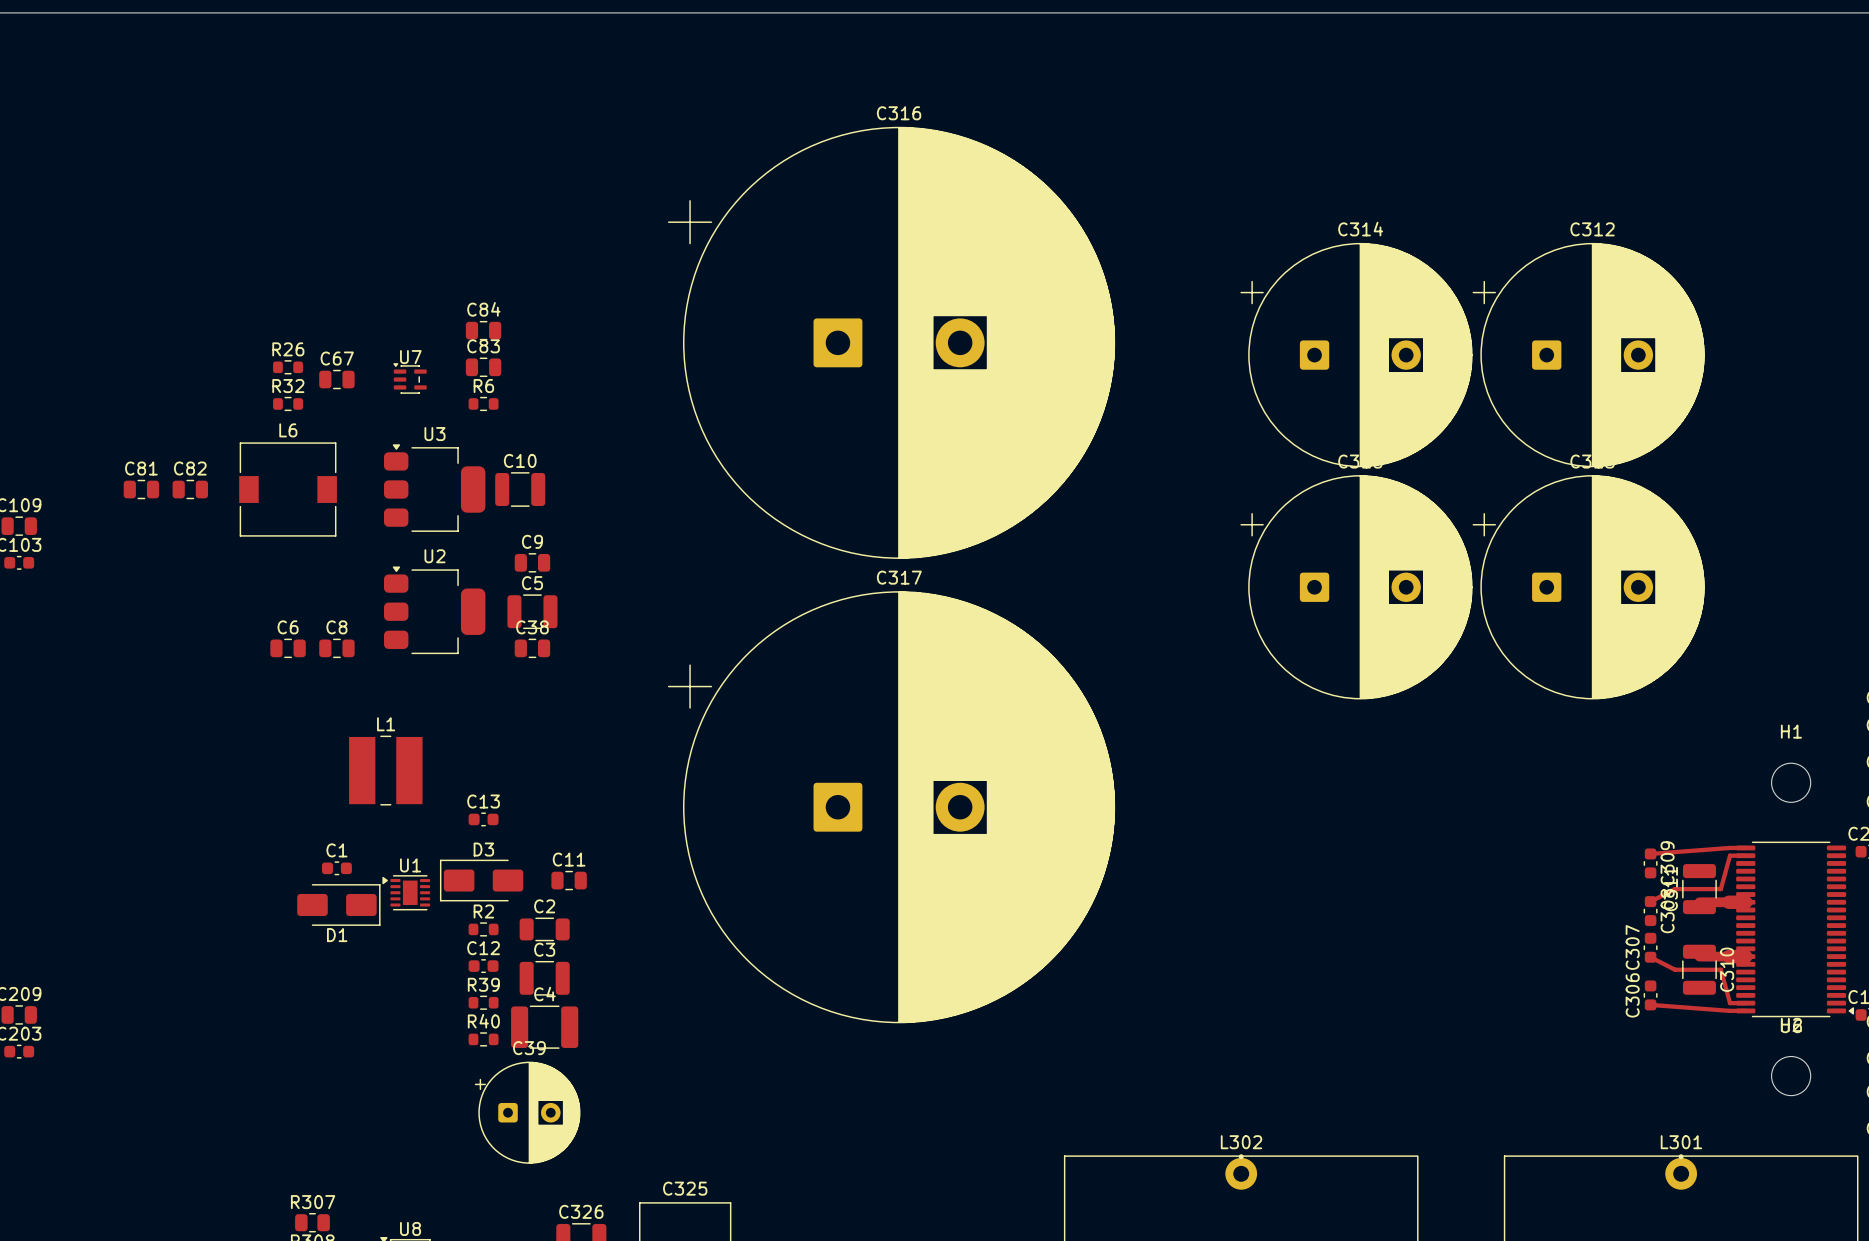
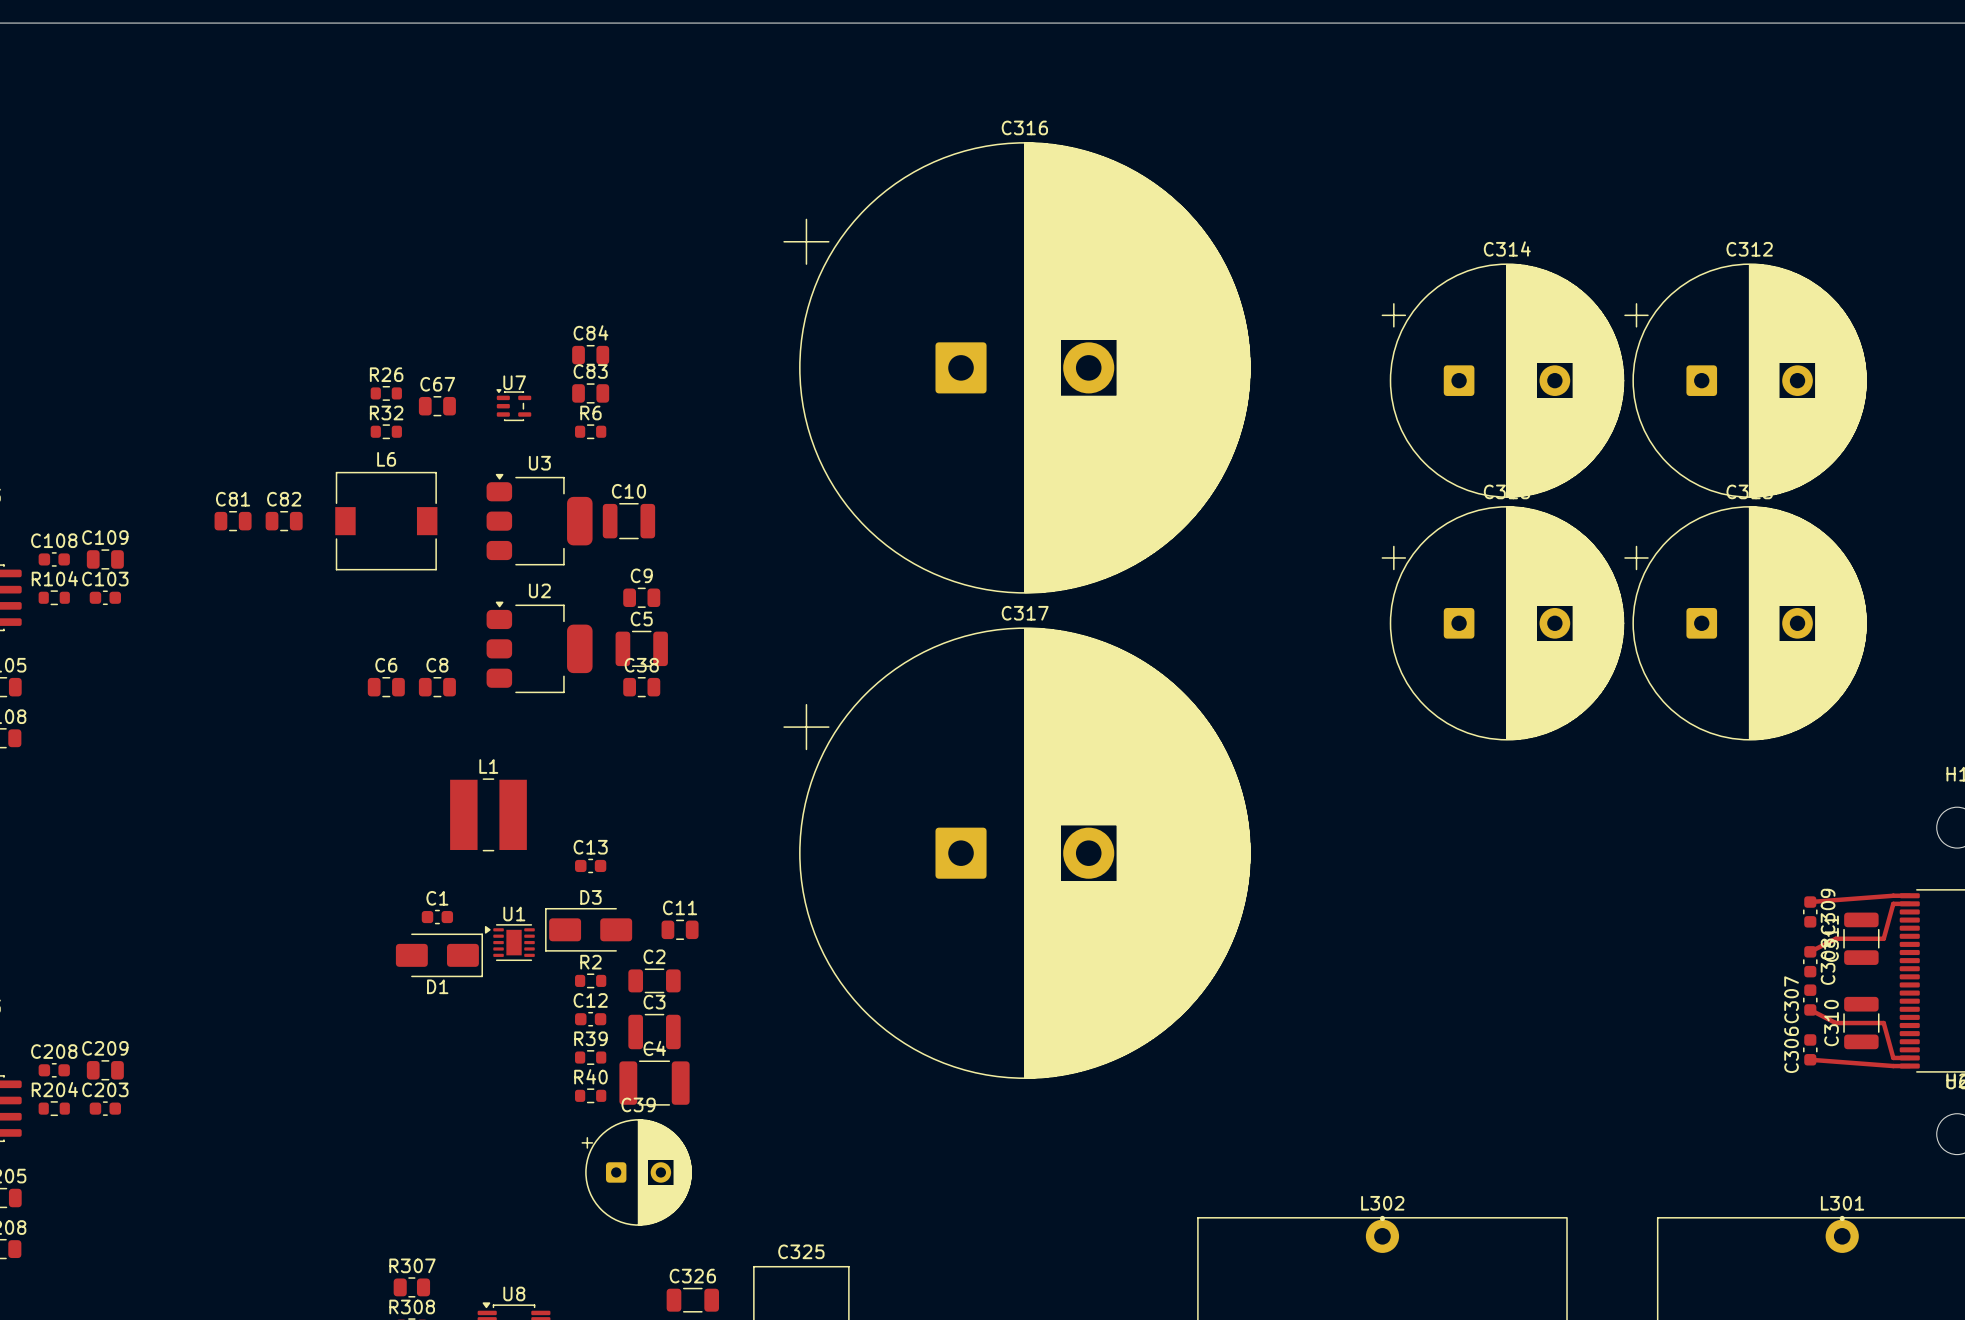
top track: (1699, 902) (1745, 902) -> none
top track: (1699, 956) (1745, 956) -> none
C310 name position: C310 (1727, 969) -> C310 (1831, 1023)

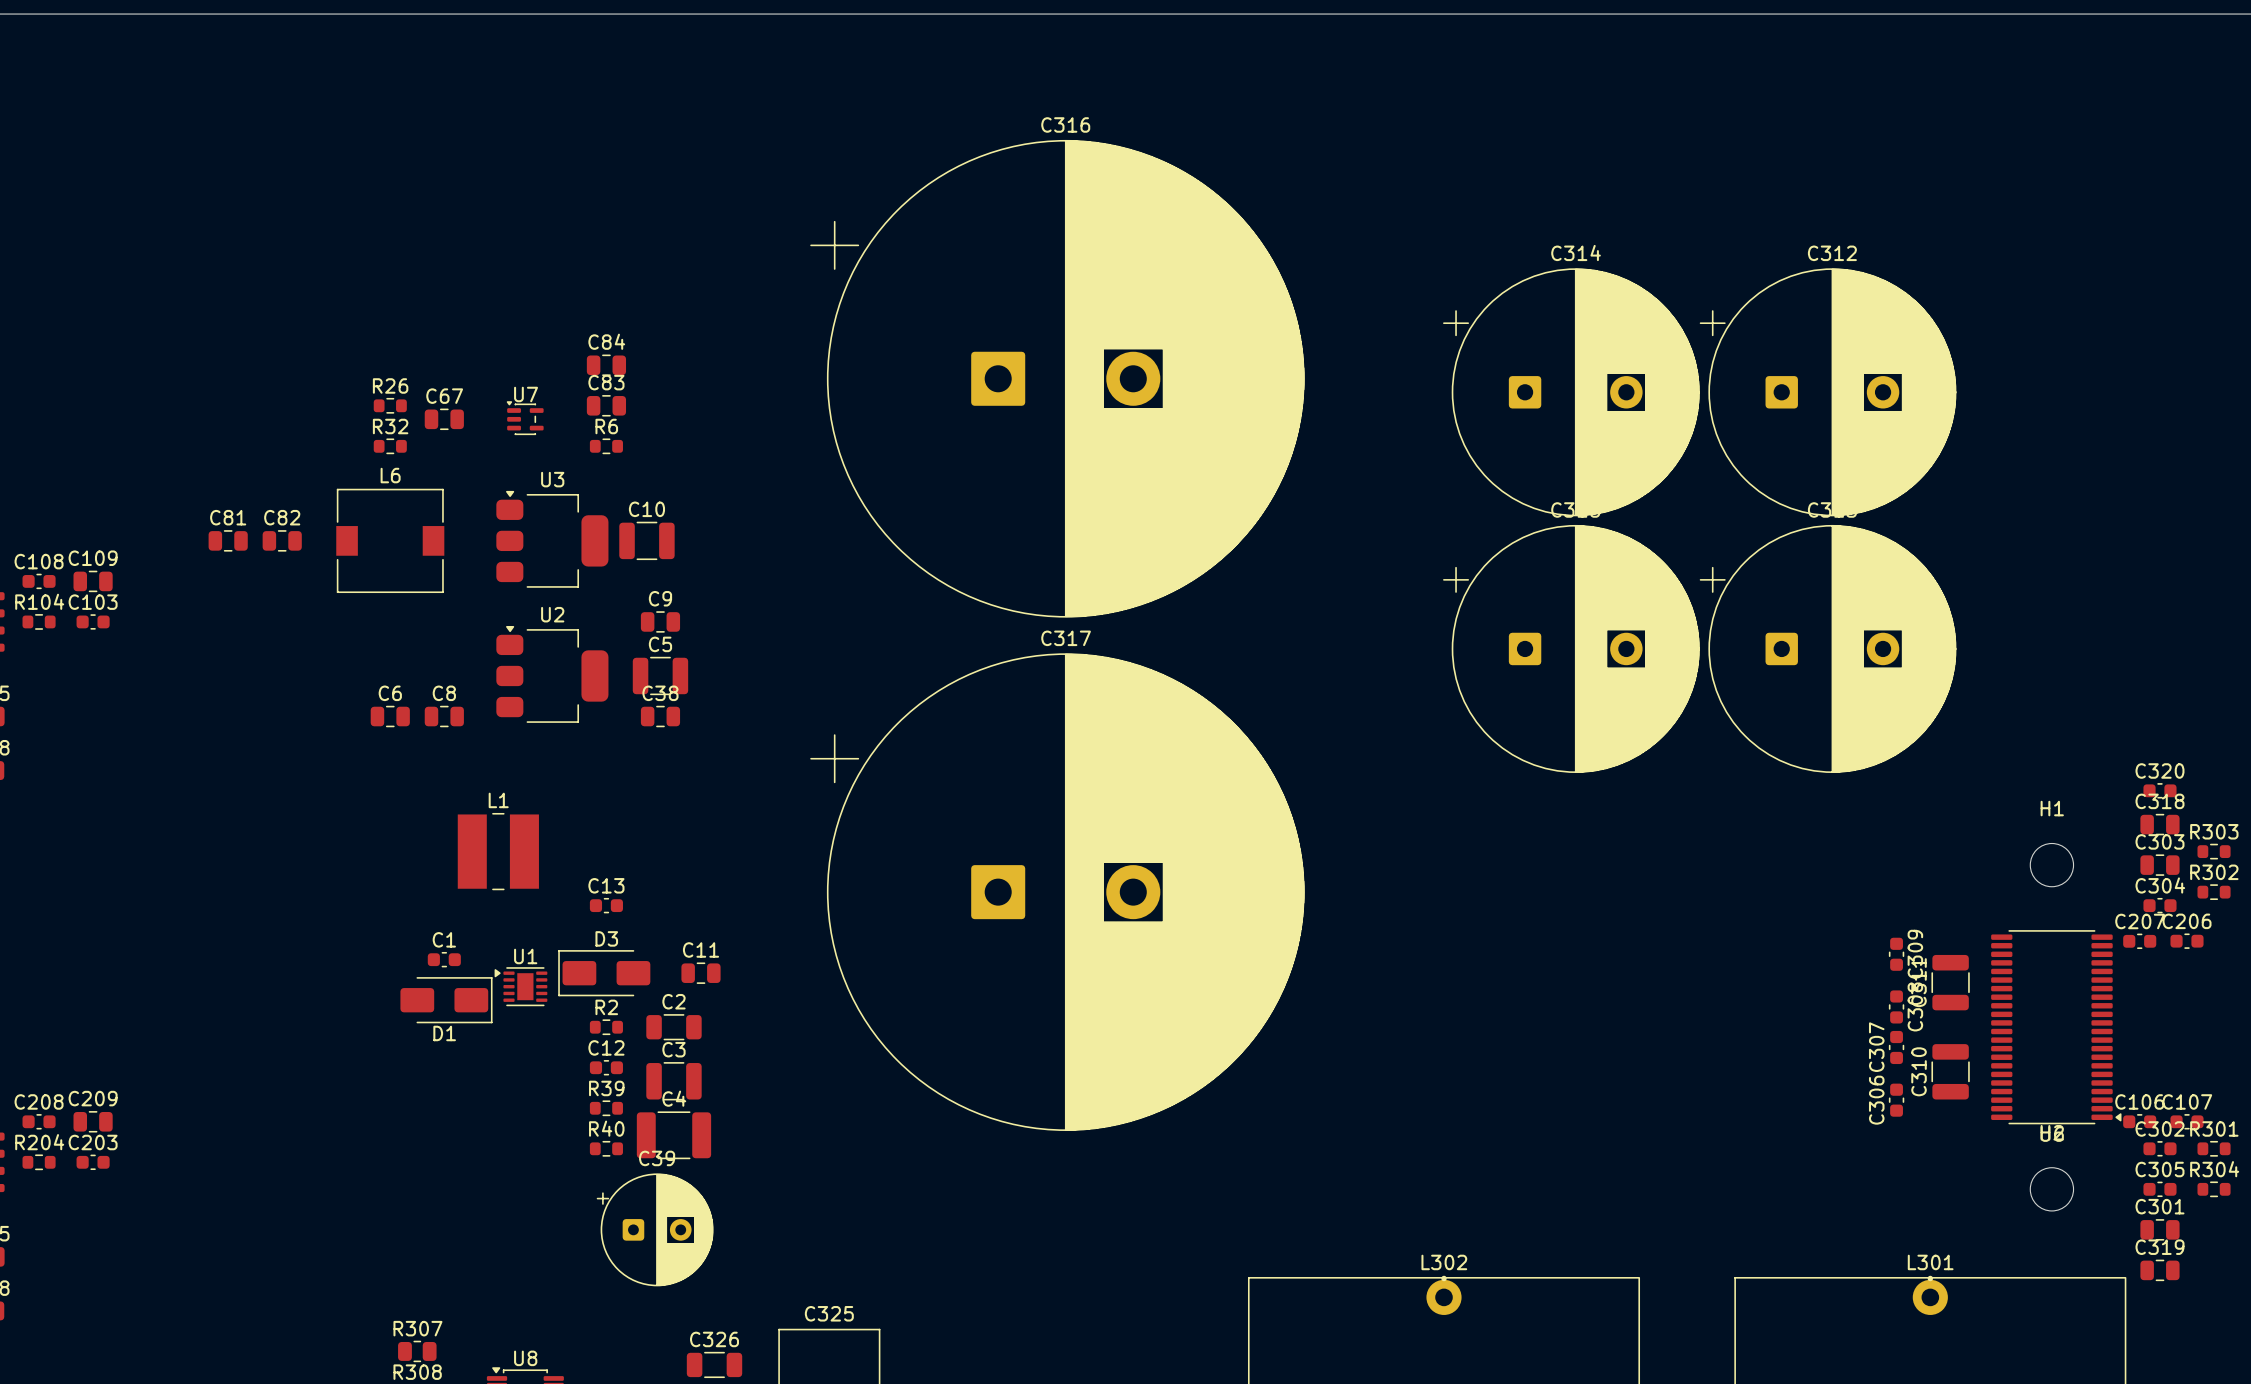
top track: (1909, 895) (1810, 902) -> none
top track: (1909, 903) (1893, 903) (1883, 938) (1835, 938) (1810, 951) -> none
top track: (1810, 1009) (1835, 1023) (1883, 1023) (1893, 1057) (1909, 1057) -> none
top track: (1810, 1059) (1909, 1066) -> none

